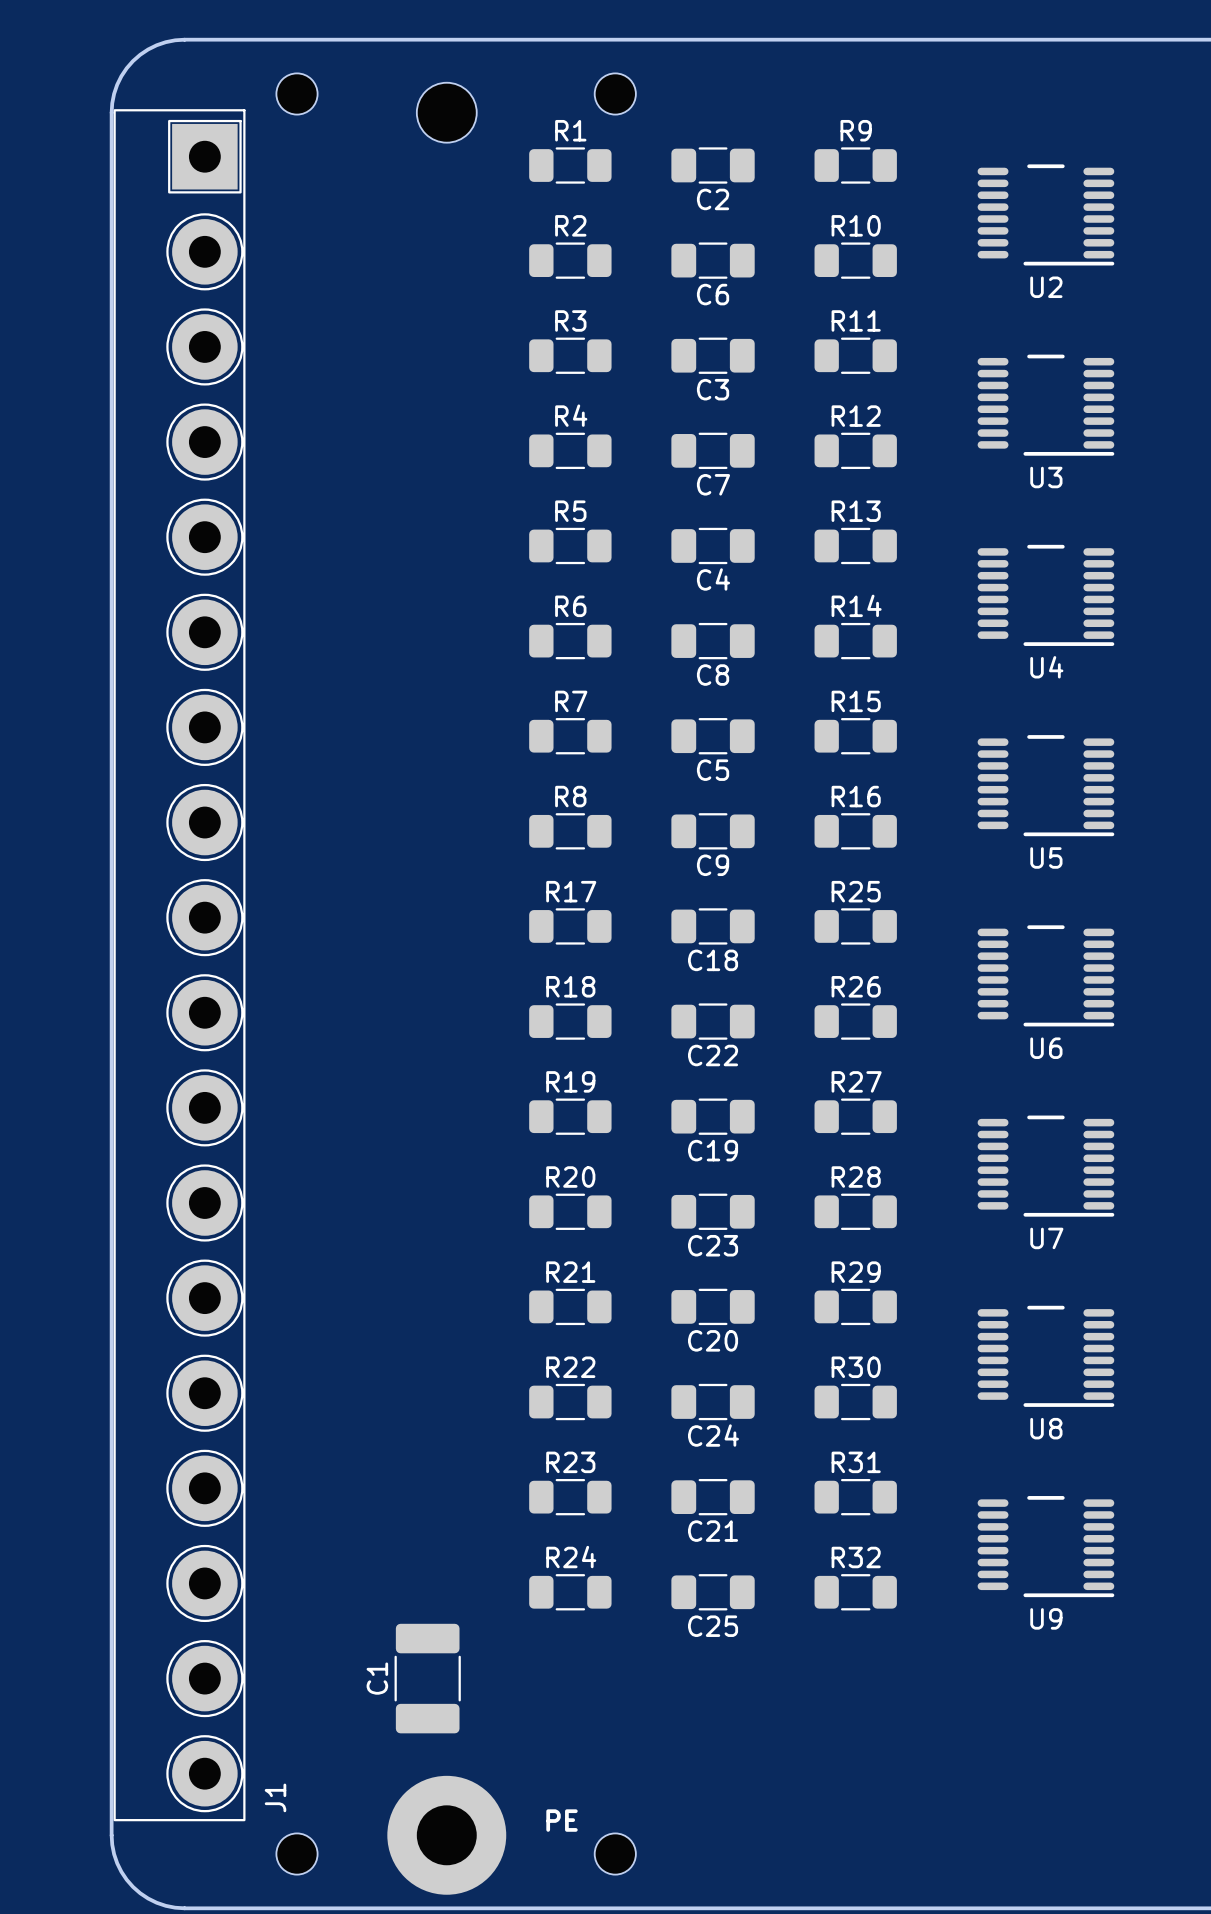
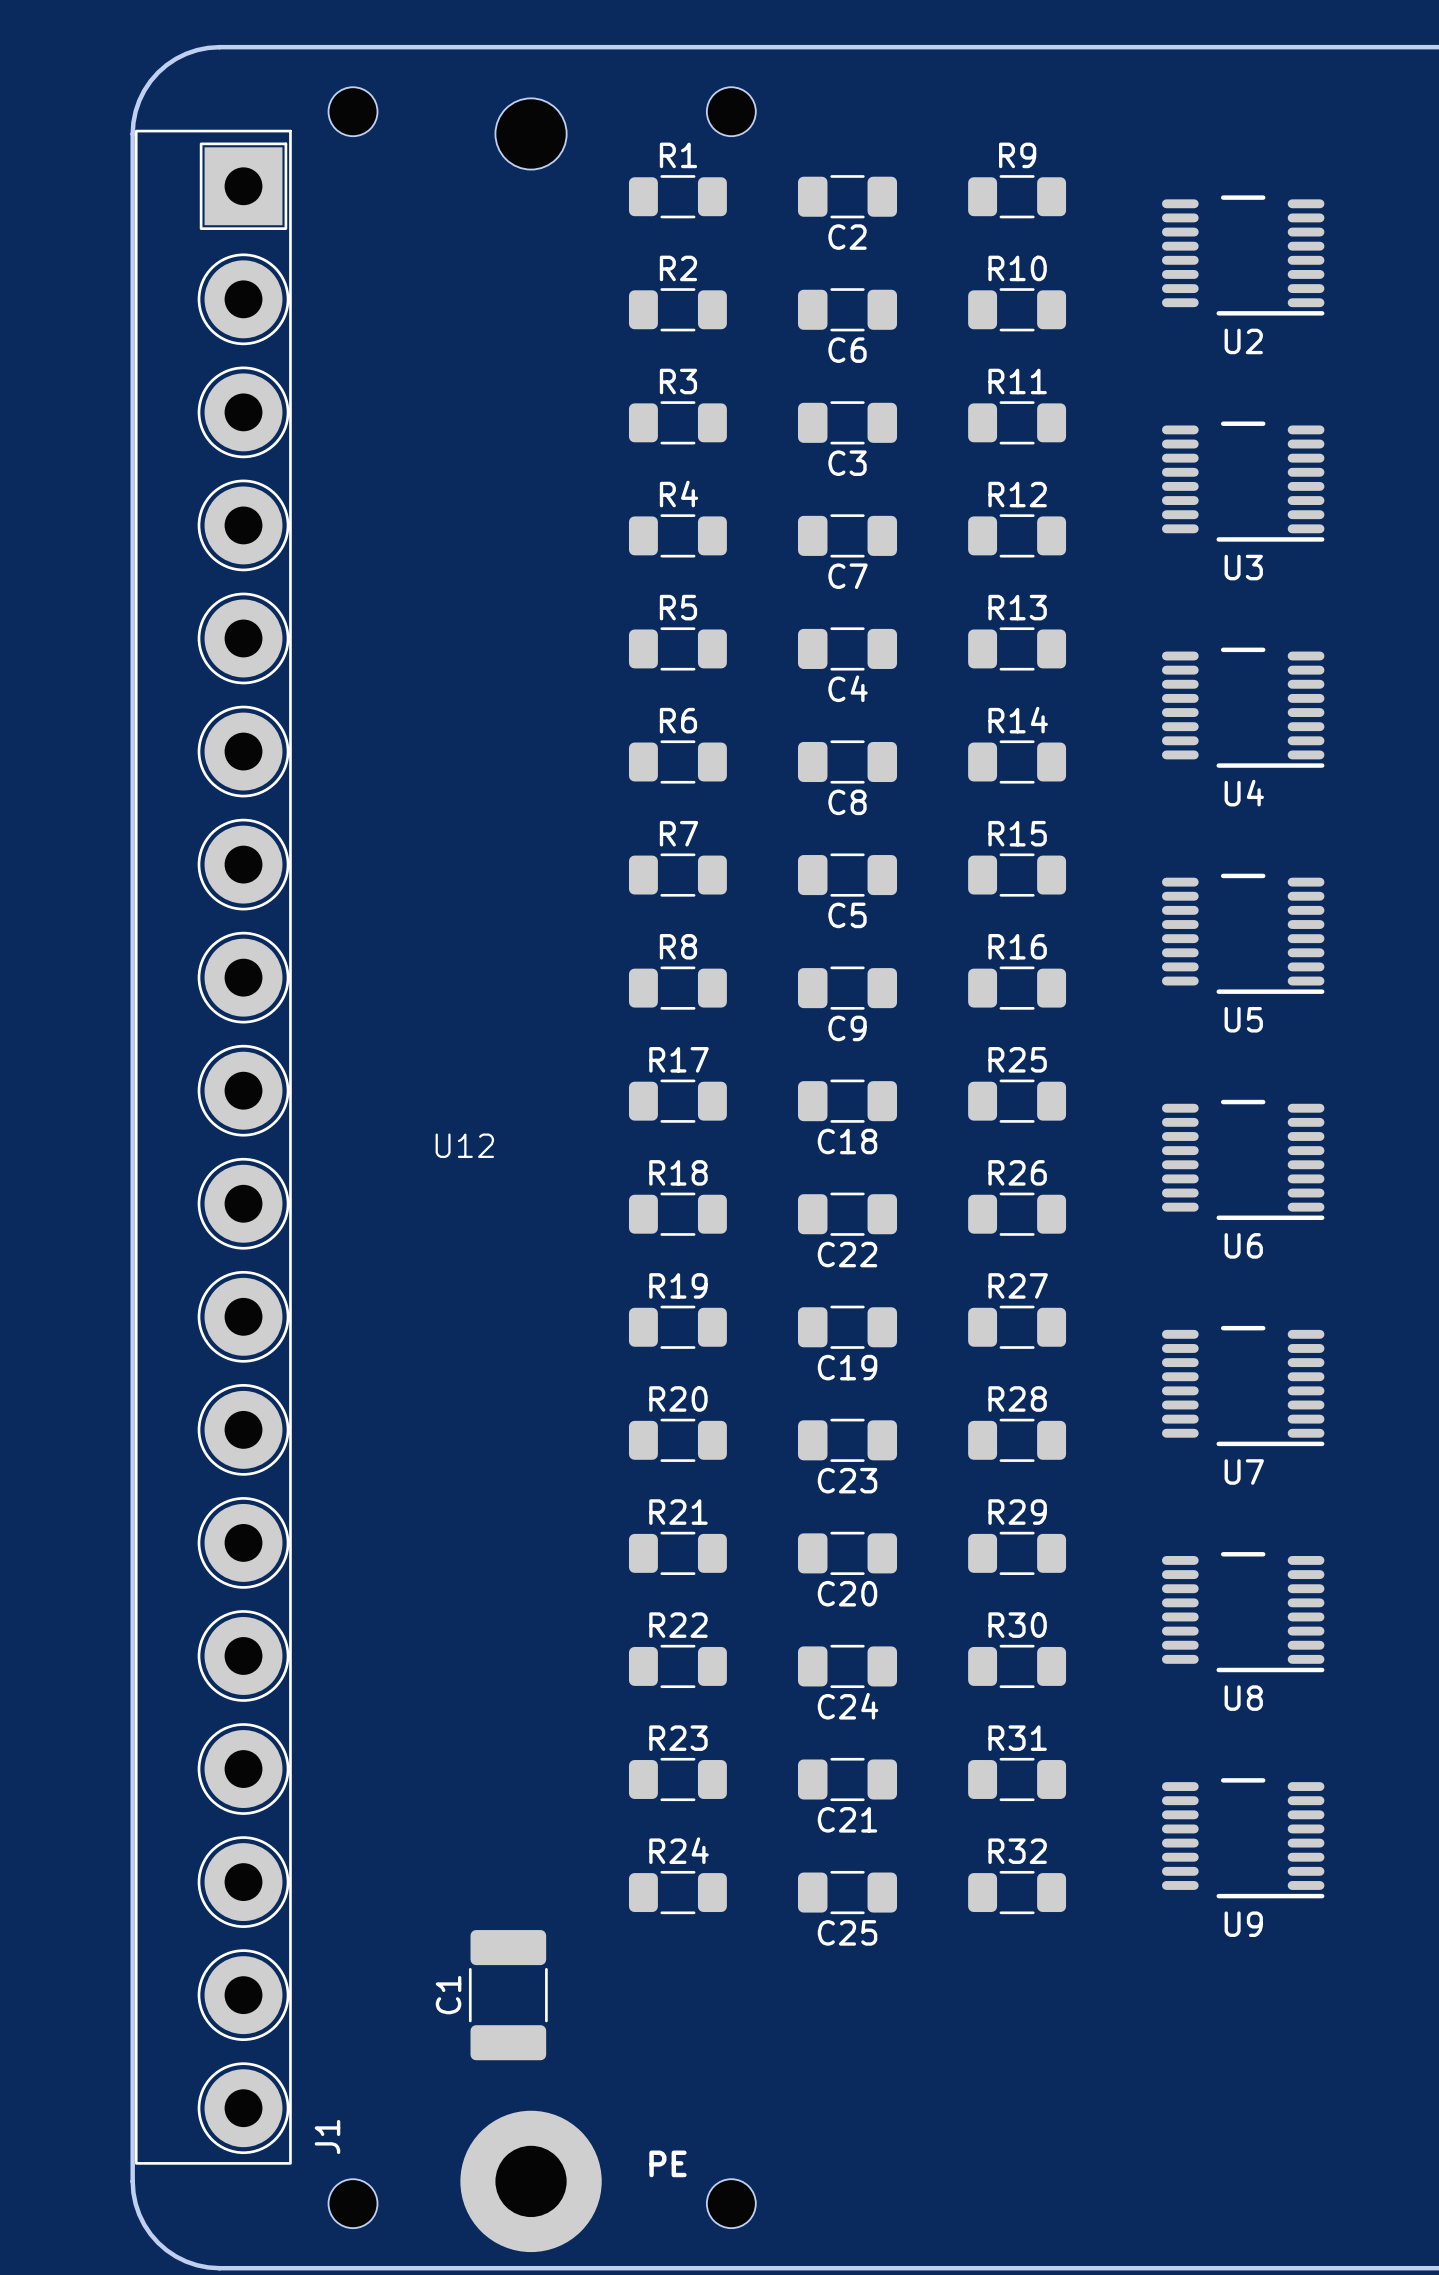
U12: none -> (542, 1157)

